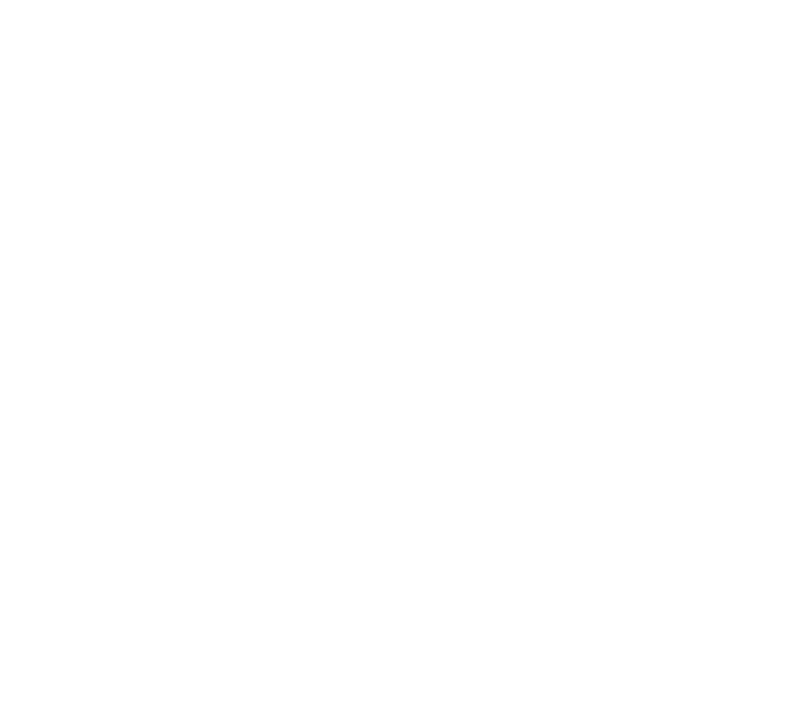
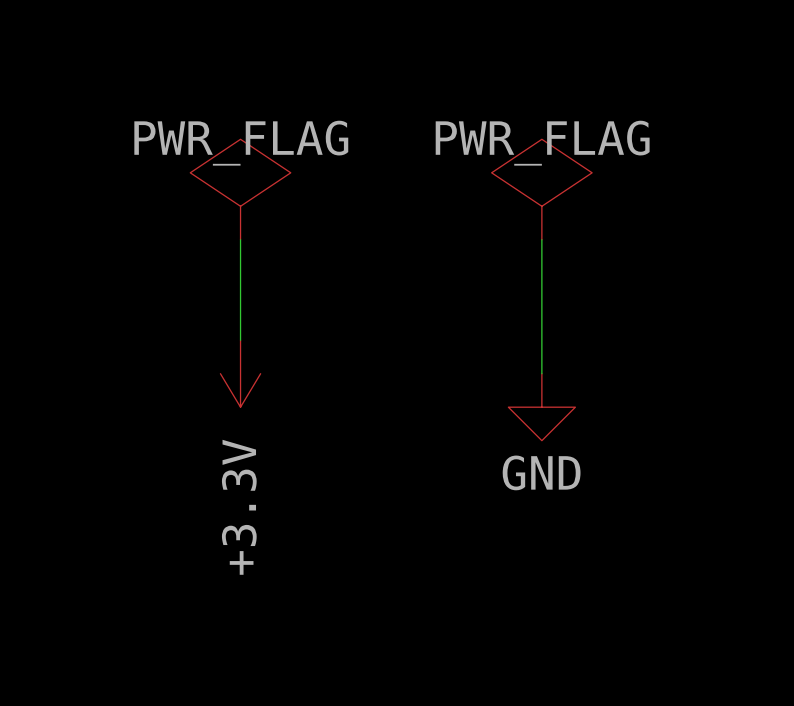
power symbol: none -> PWR_FLAG (240, 189)
power symbol: none -> PWR_FLAG (541, 189)
wire: none -> (240, 239) (240, 340)
wire: none -> (541, 239) (541, 373)
power symbol: none -> +3.3V (240, 373)
power symbol: none -> GND (541, 407)

